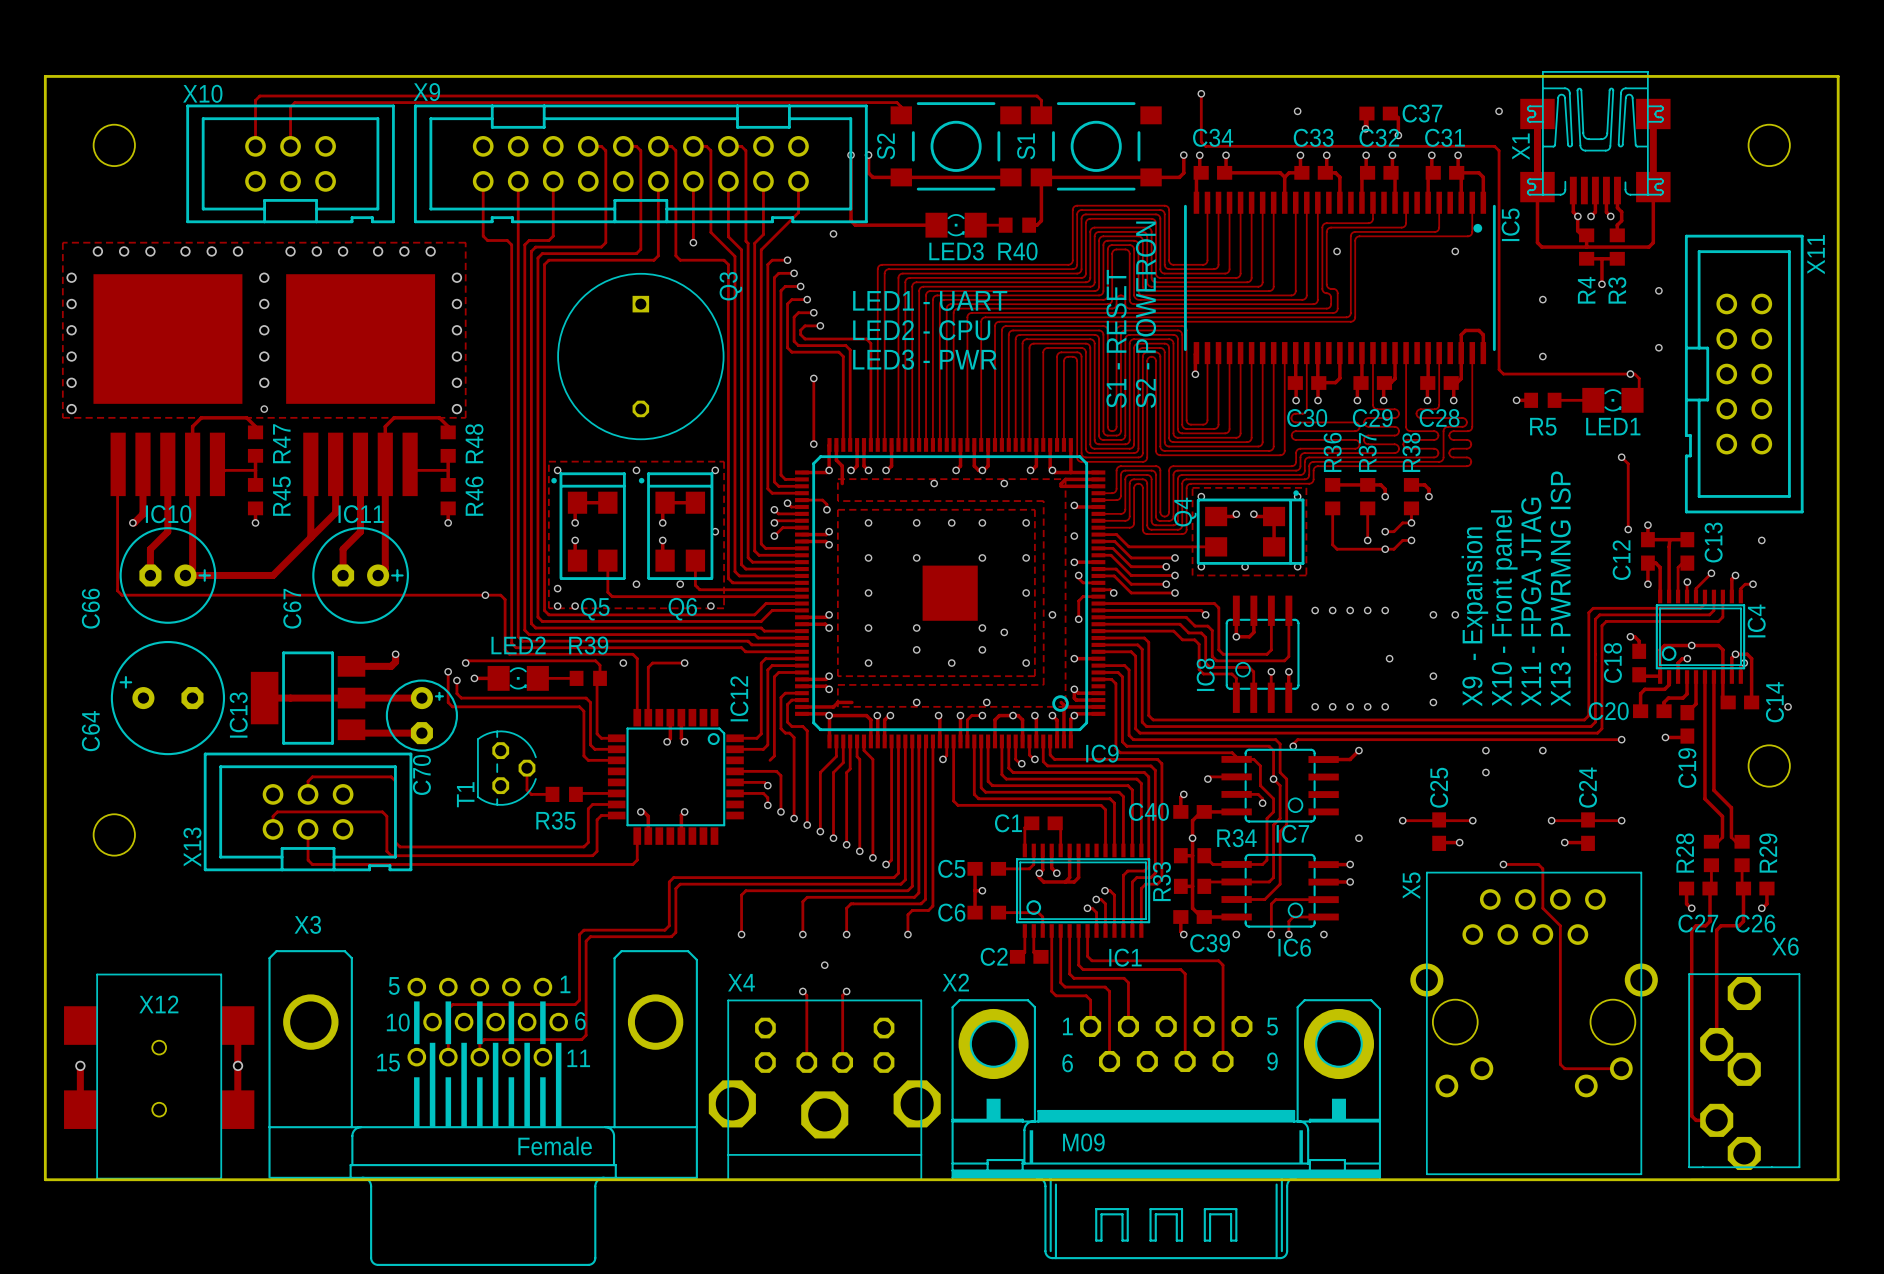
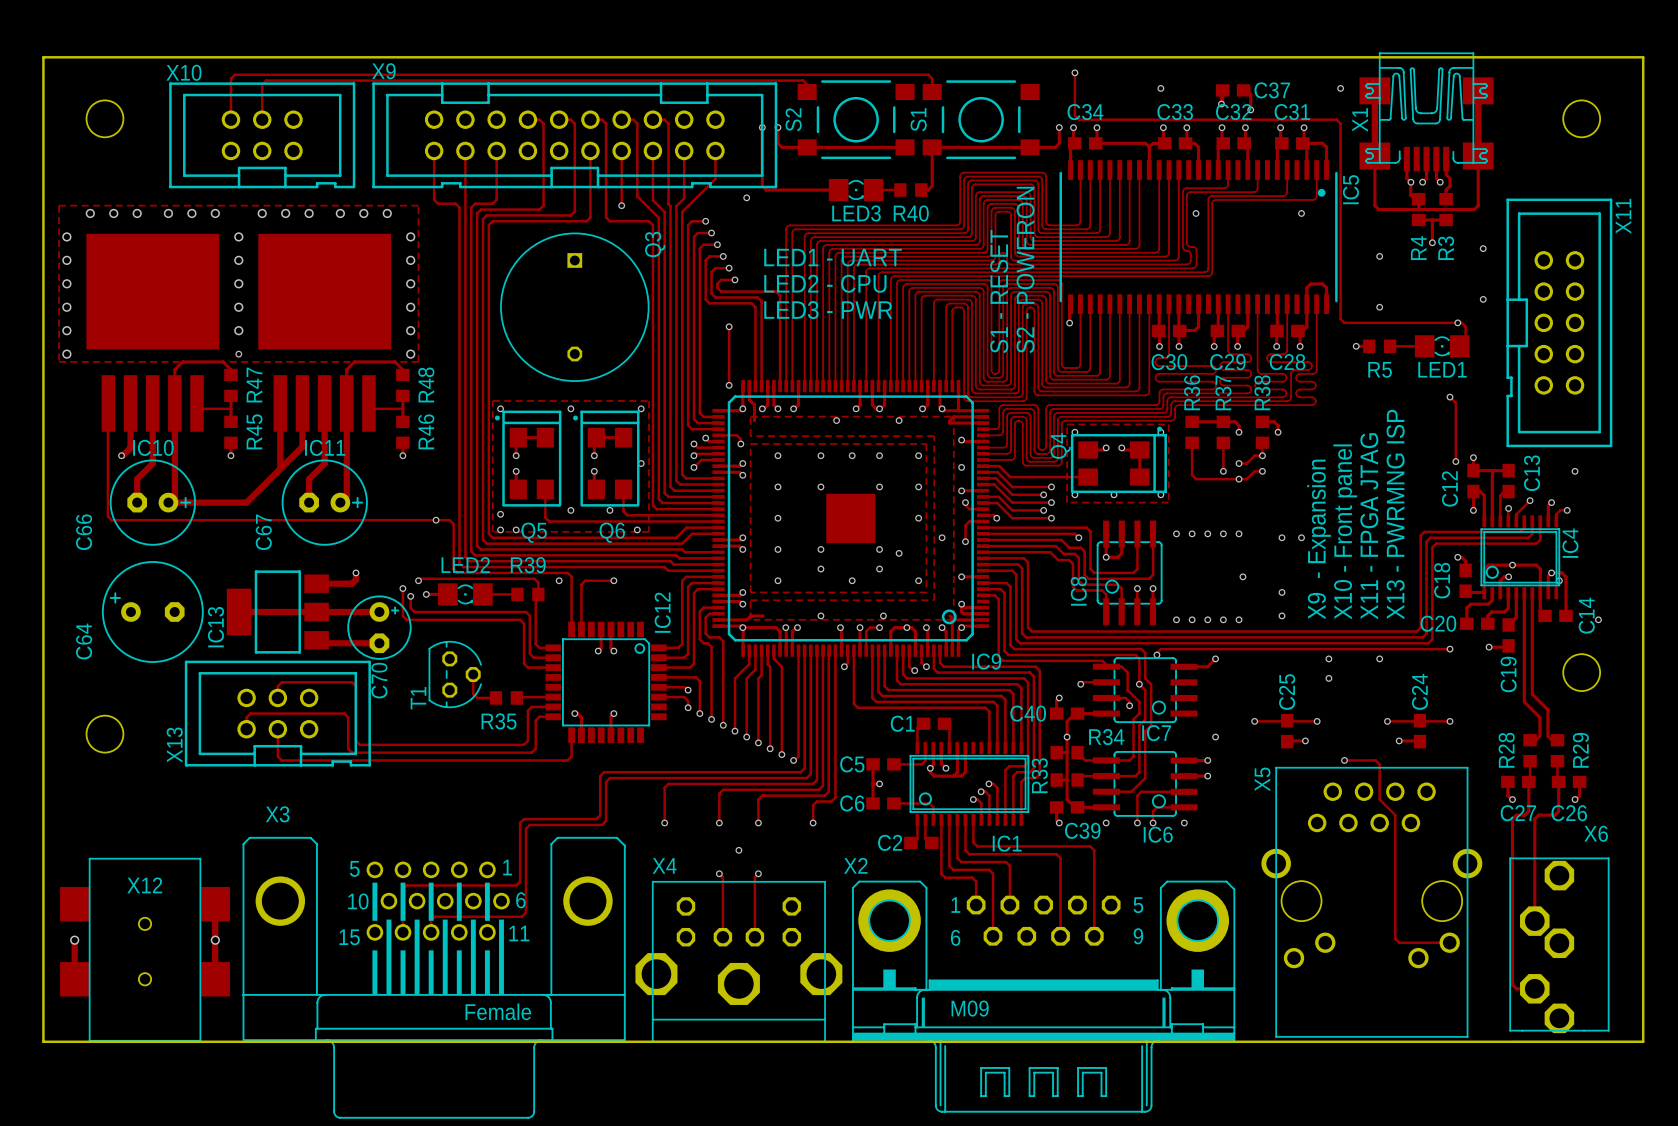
track: none -> (658, 667) (690, 667)

